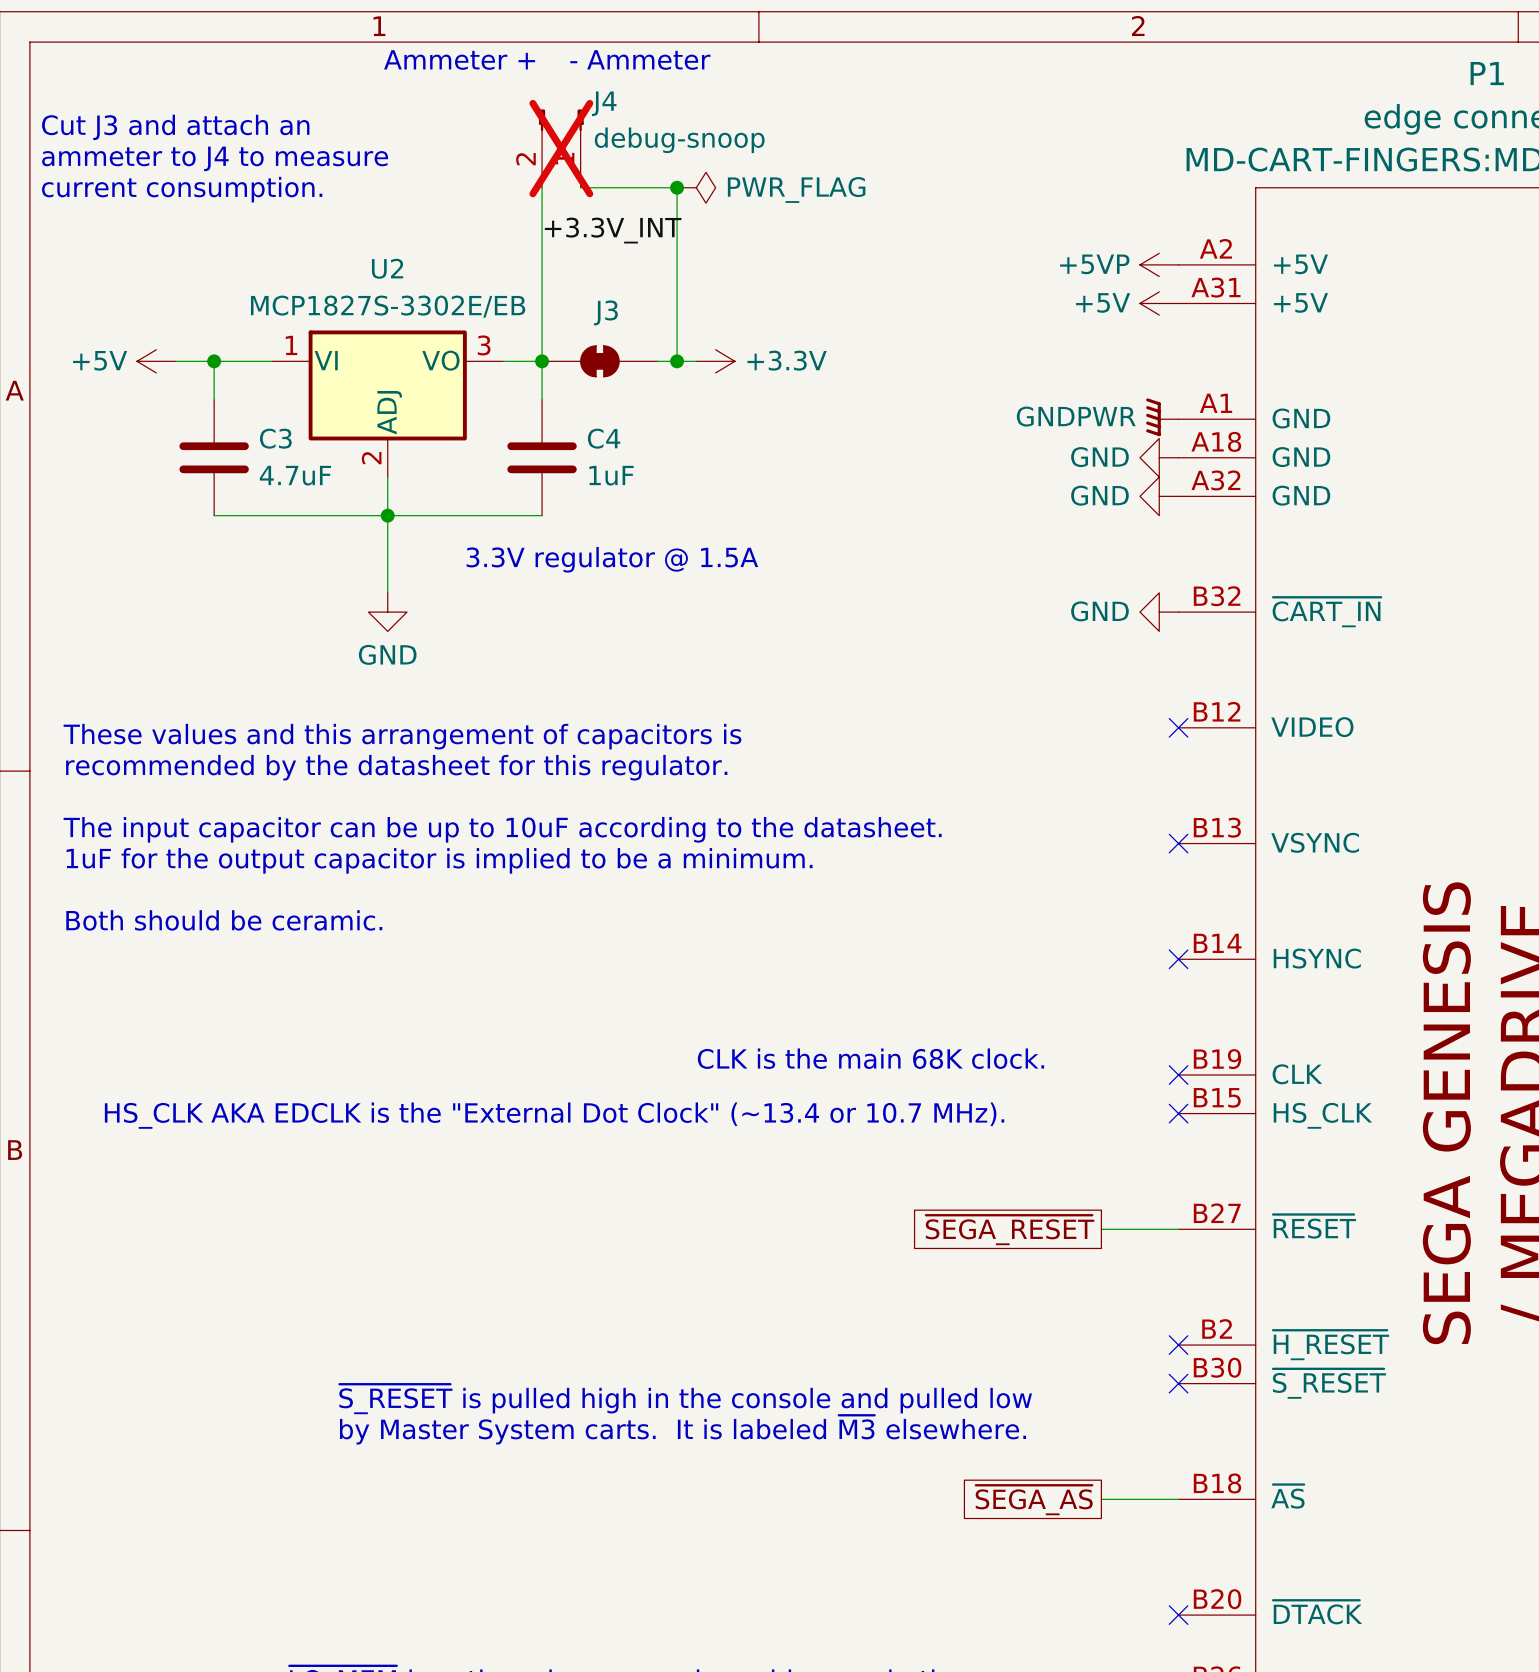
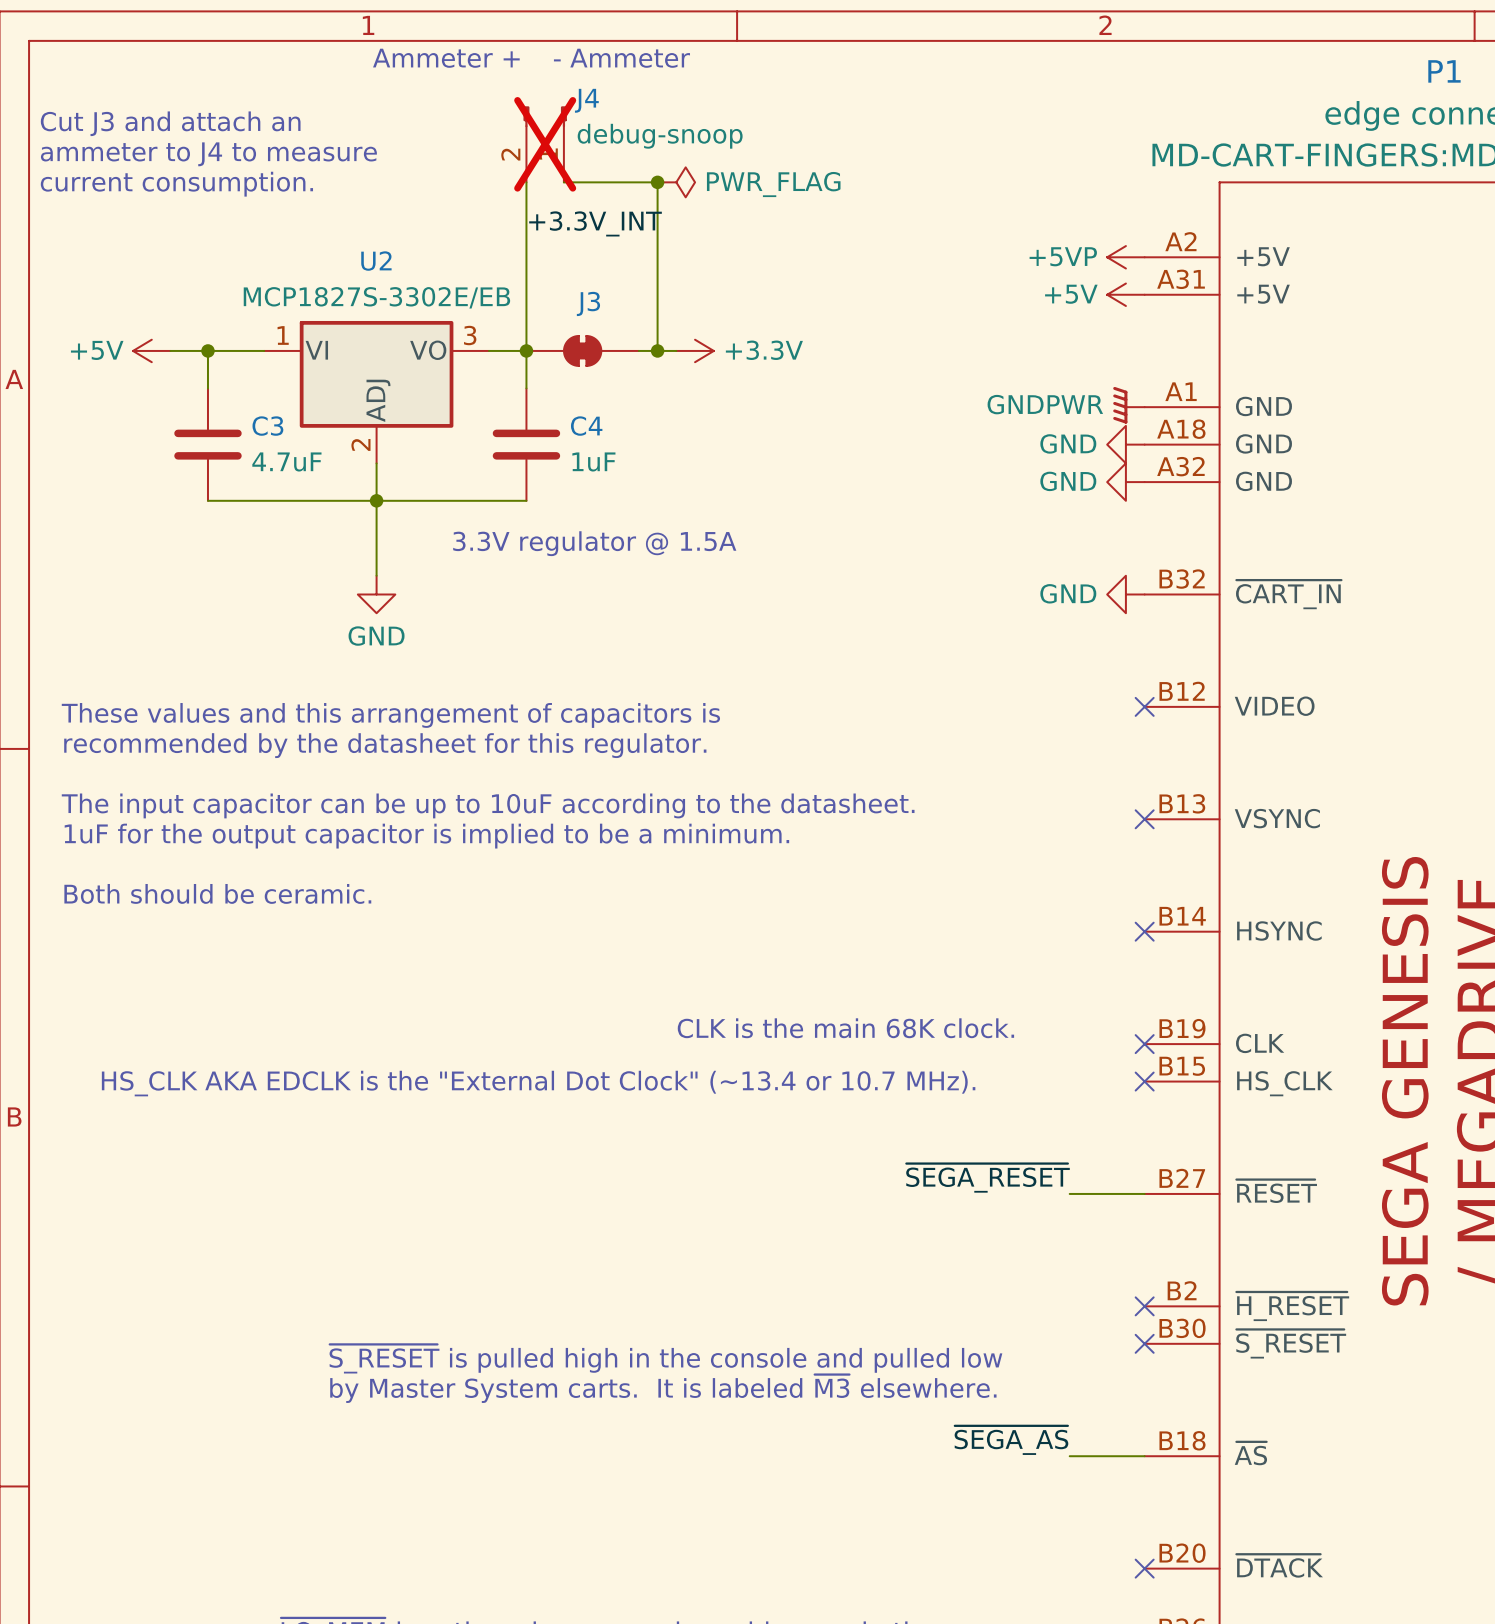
label: none -> ~{SEGA_RESET} (988, 1178)
global label: ~{SEGA_RESET} (1010, 1230) -> none
label: none -> ~{SEGA_AS} (1011, 1440)
global label: ~{SEGA_AS} (1034, 1500) -> none

